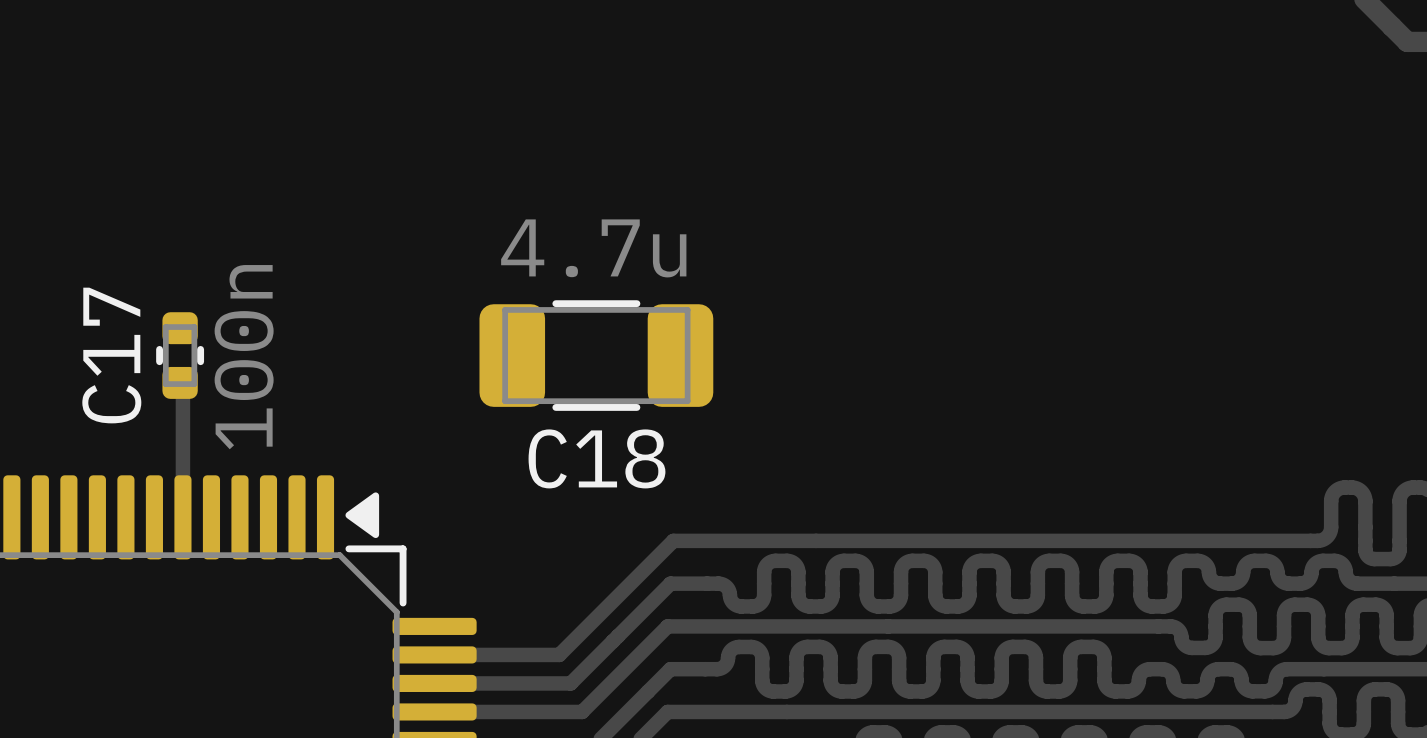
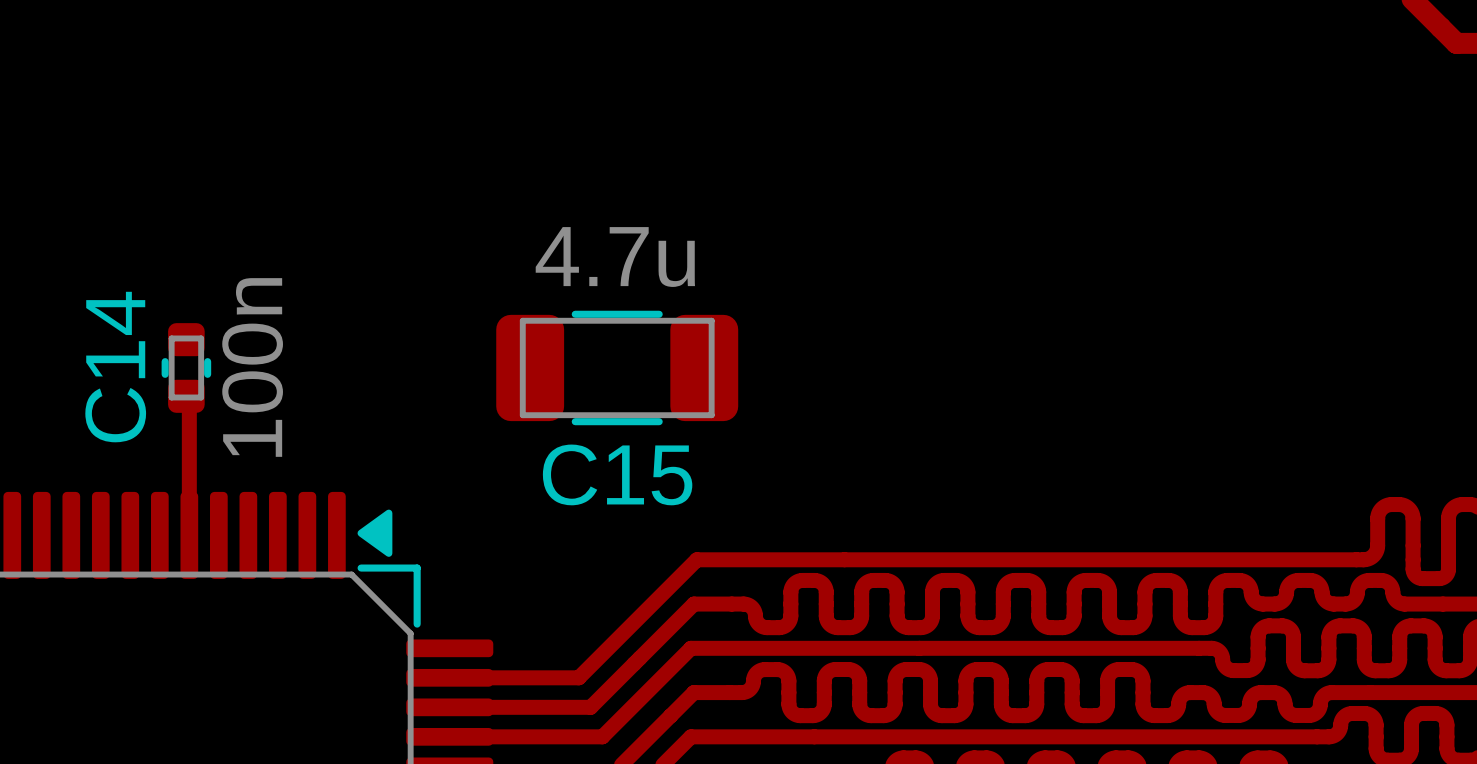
C17 name: C17 (111, 355) -> C14 (115, 367)
C18 name: C18 (596, 458) -> C15 (617, 474)

